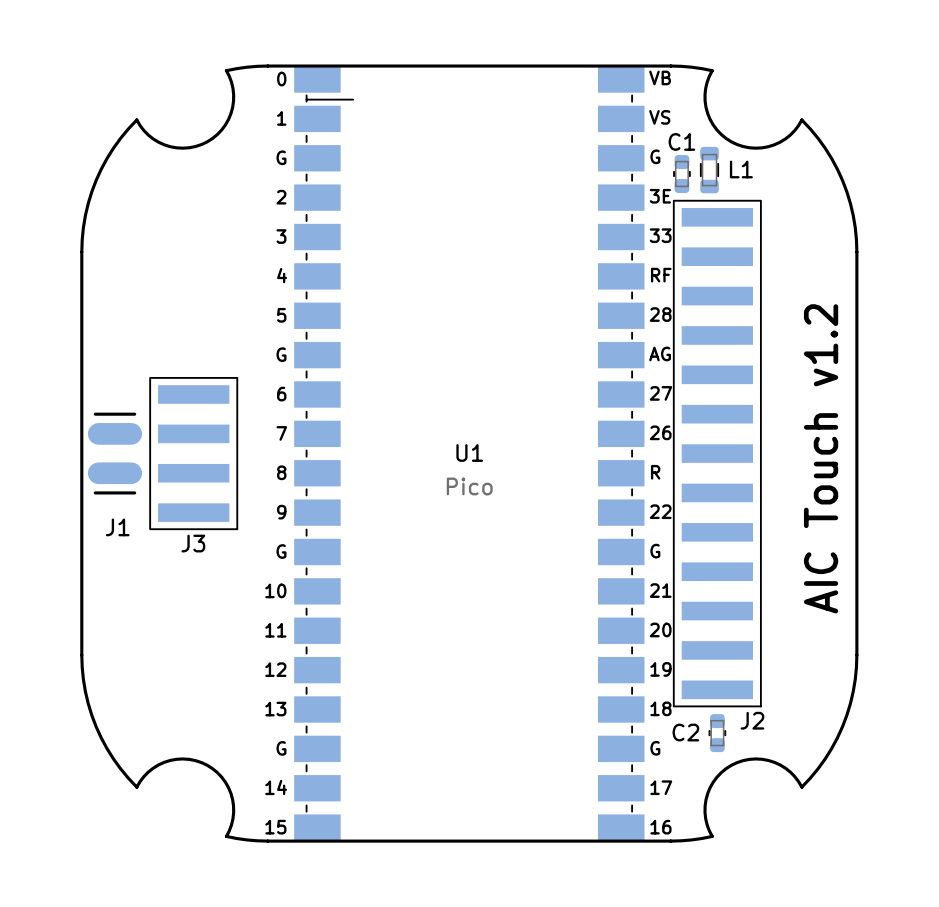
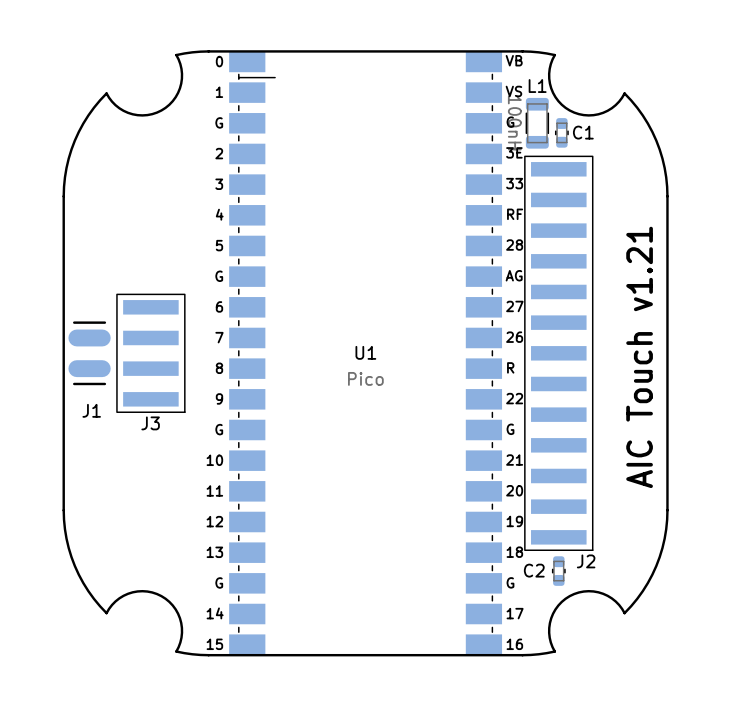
C1 name position: C1 (681, 141) -> C1 (583, 132)
L1 footprint: [699, 146, 720, 194] -> [525, 97, 550, 149]
L1 value: none -> 100nH (514, 122)
L1 name position: L1 (741, 169) -> L1 (537, 86)
C1 position: (681, 174) -> (561, 132)
text: AIC Touch v1.2 (821, 458) -> AIC Touch v1.21 (639, 357)

